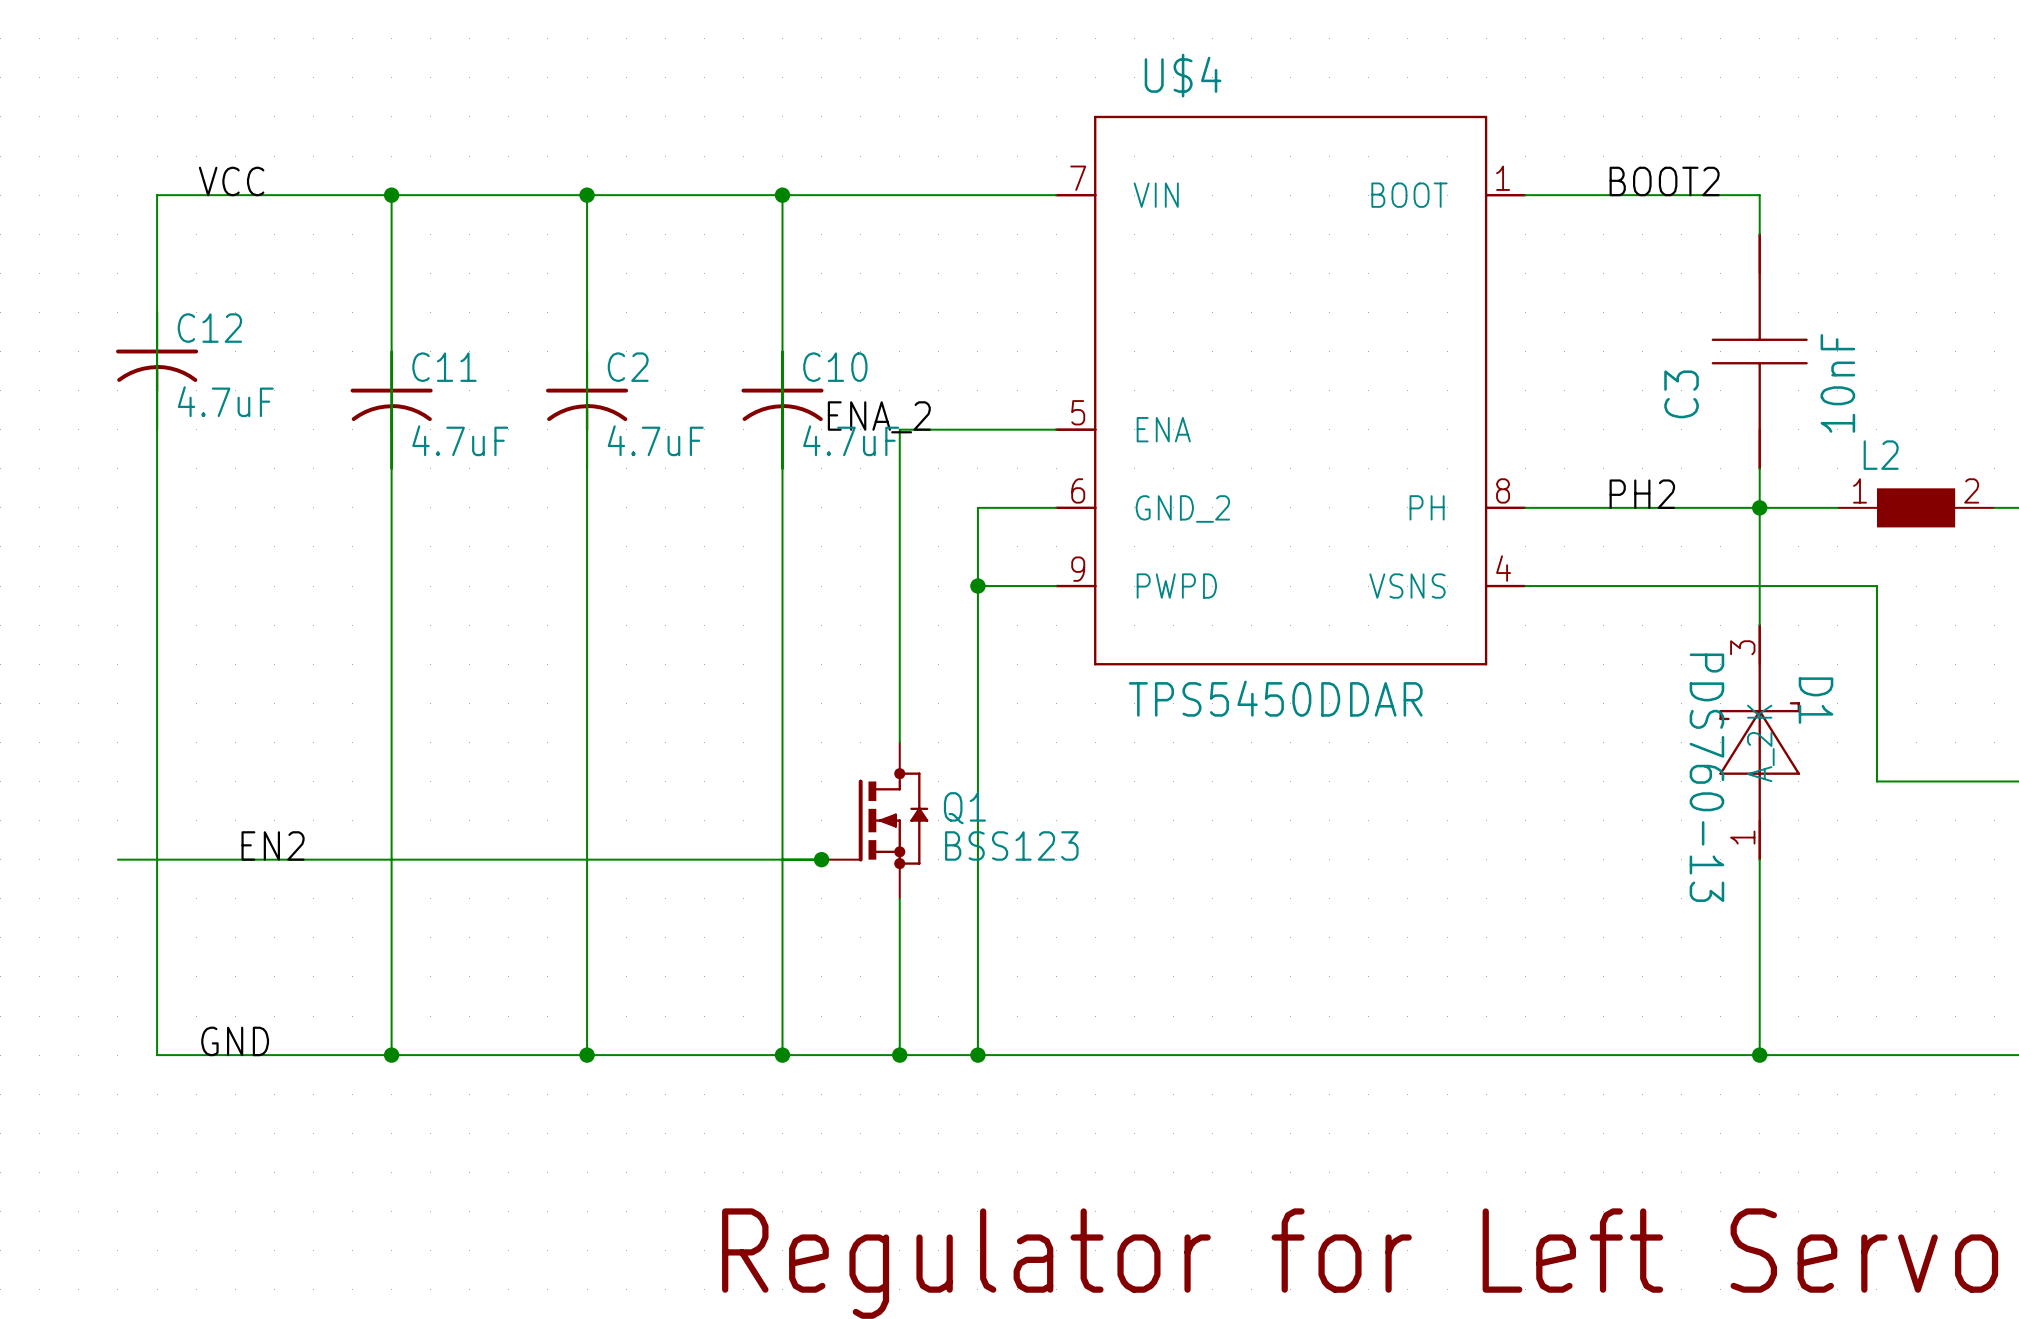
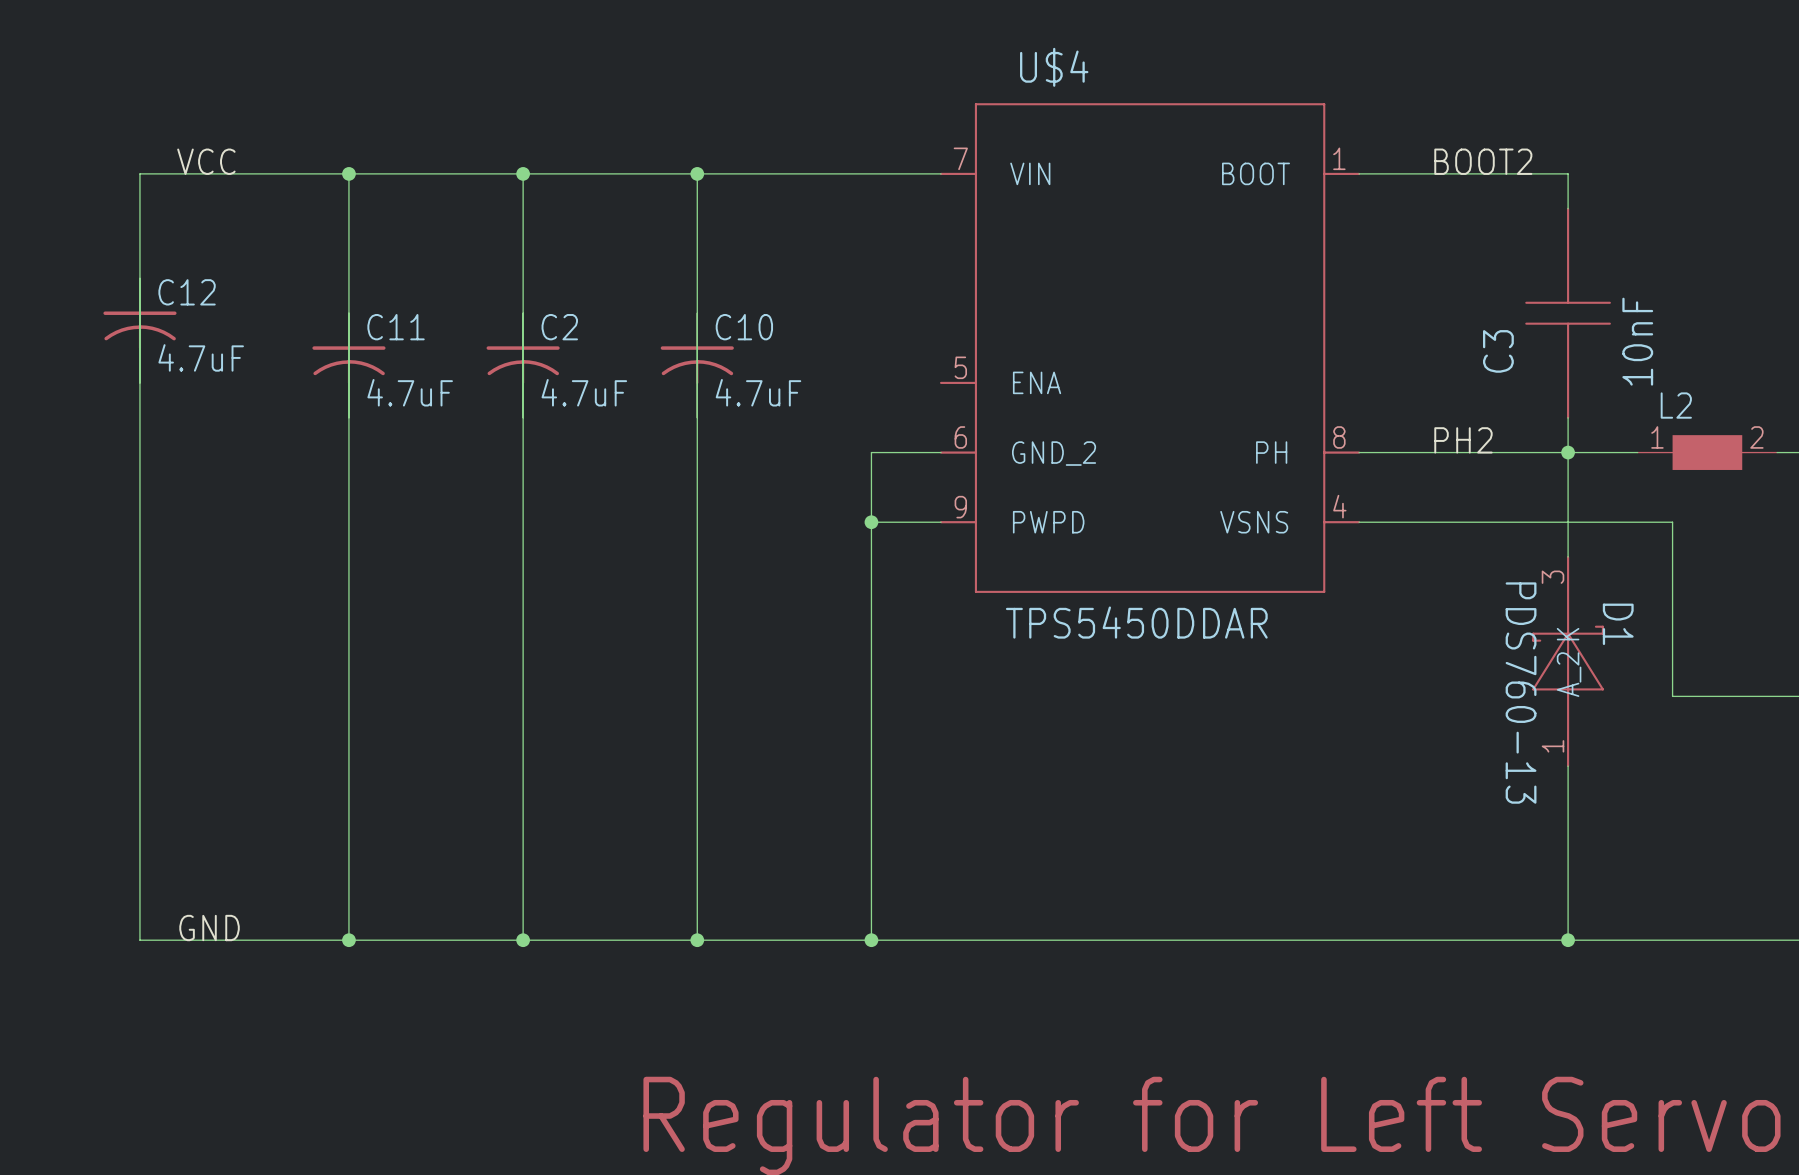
label: ENA_2 (879, 417) -> none
wire: (1056, 429) (899, 429) (899, 742) -> none
Q1: BSS123 (874, 820) -> none
label: EN2 (273, 845) -> none
wire: (117, 859) (821, 859) -> none
junction: (821, 859) -> none
wire: (899, 898) (899, 1055) -> none
junction: (899, 1055) -> none

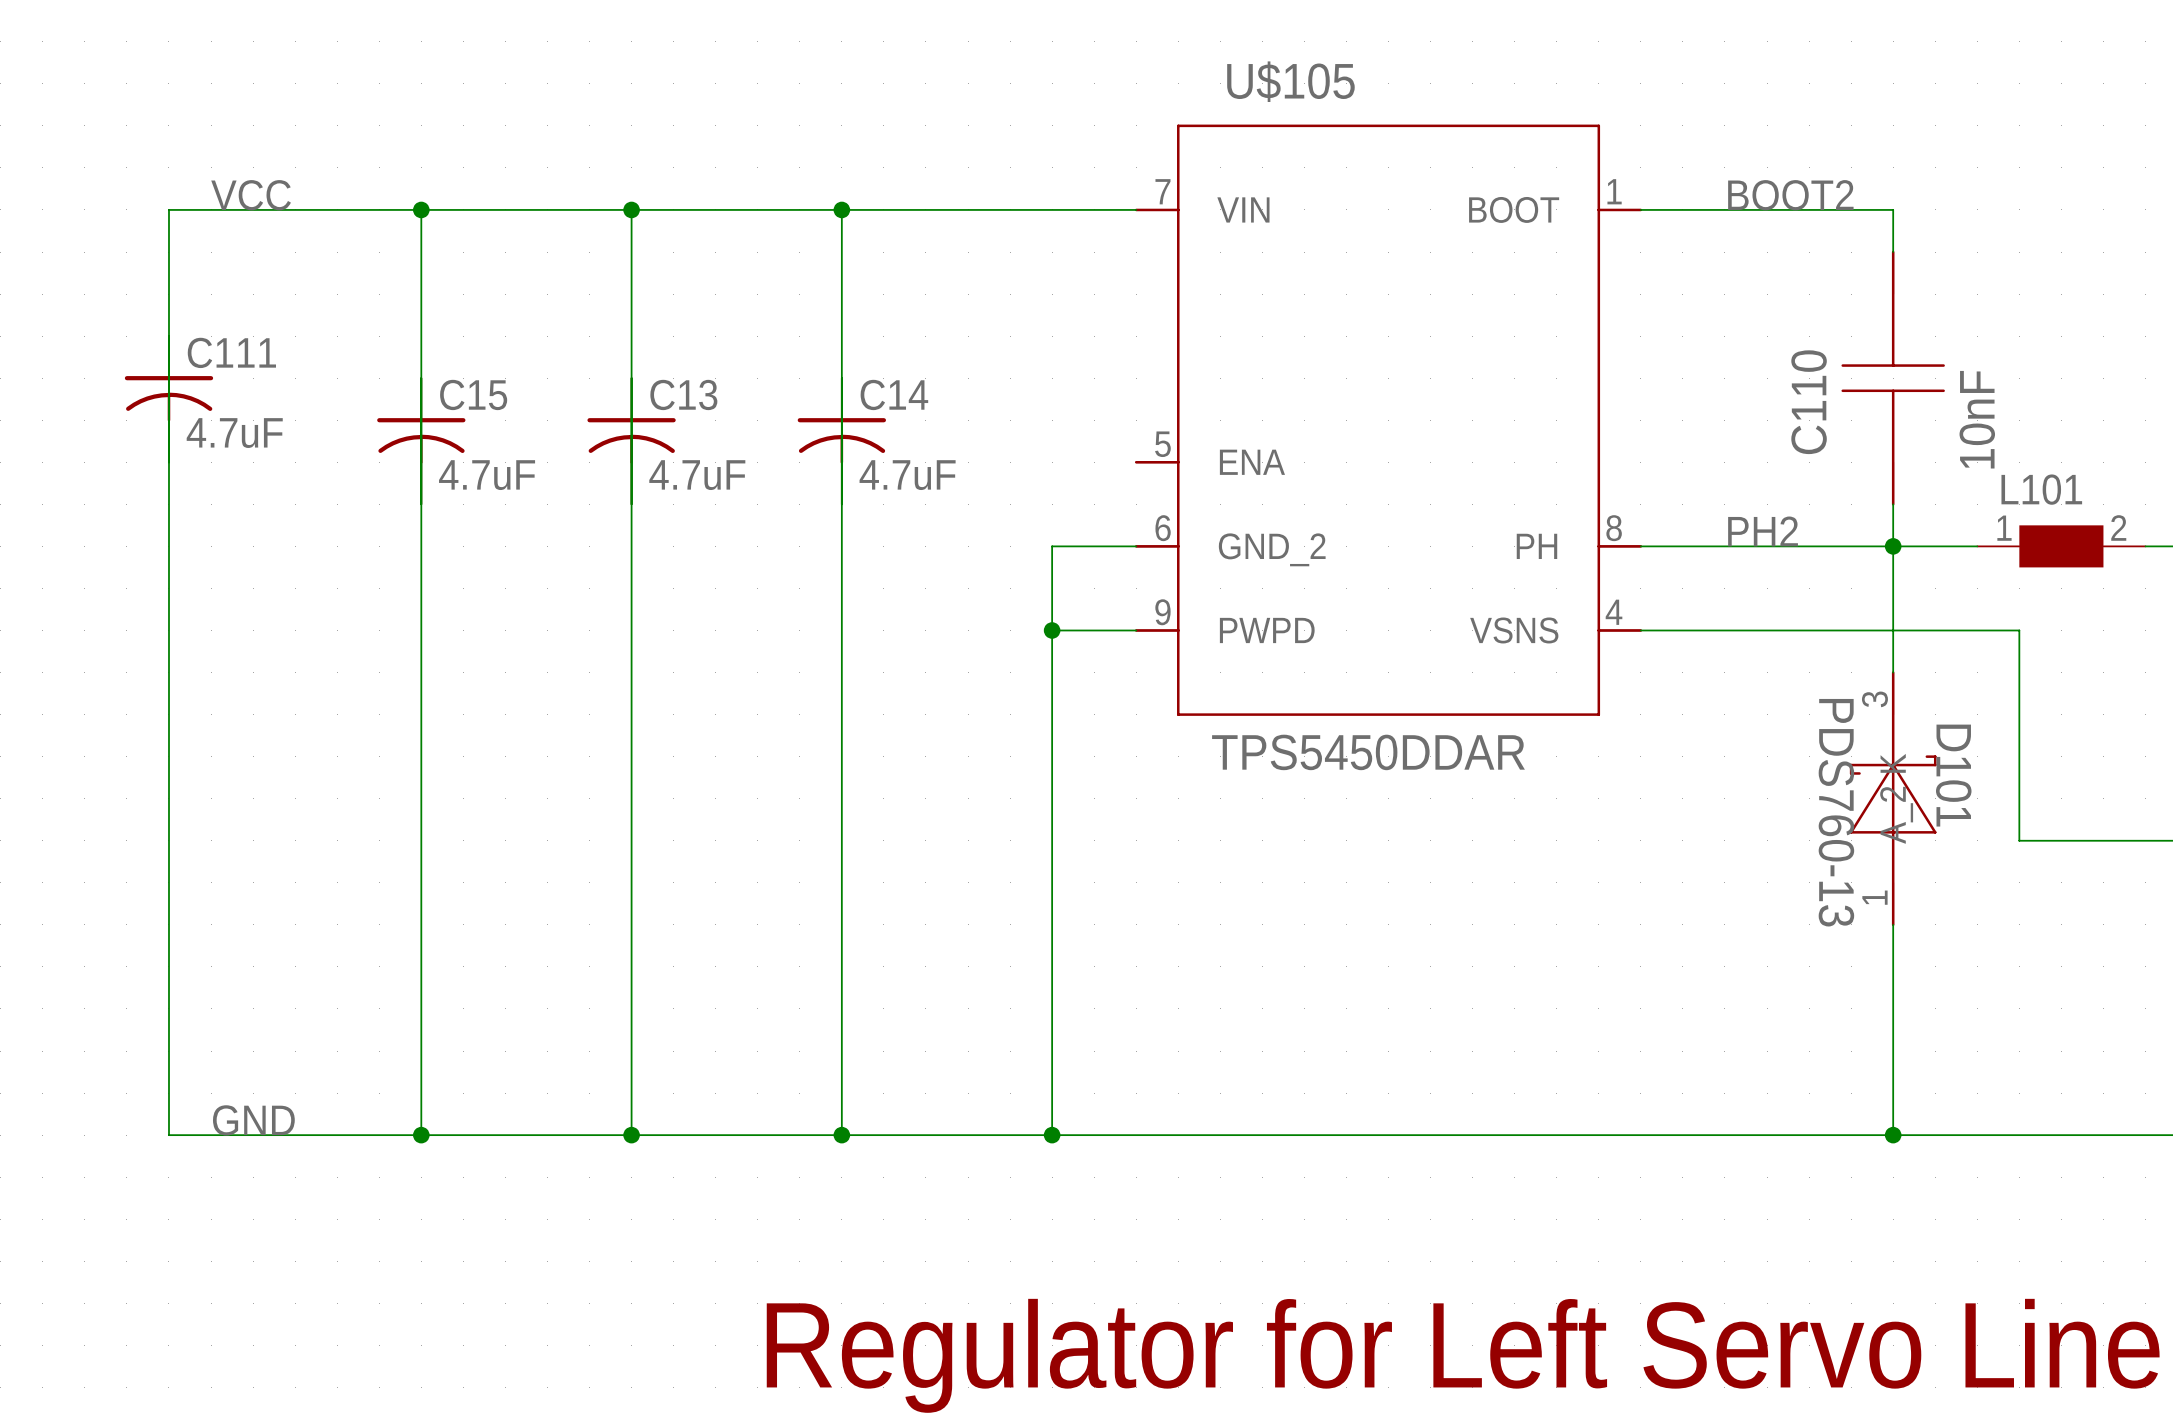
U$4 name: U$4 (1054, 67) -> U$105 (1290, 81)
C12 name: C12 (187, 292) -> C111 (231, 352)
C11 name: C11 (396, 327) -> C15 (473, 394)
C2 name: C2 (559, 327) -> C13 (683, 394)
C10 name: C10 (744, 327) -> C14 (894, 394)
C3 name: C3 (1498, 351) -> C110 (1809, 402)
L2 name: L2 (1676, 405) -> L101 (2041, 489)
D1 name: D1 (1618, 624) -> D101 (1953, 775)

